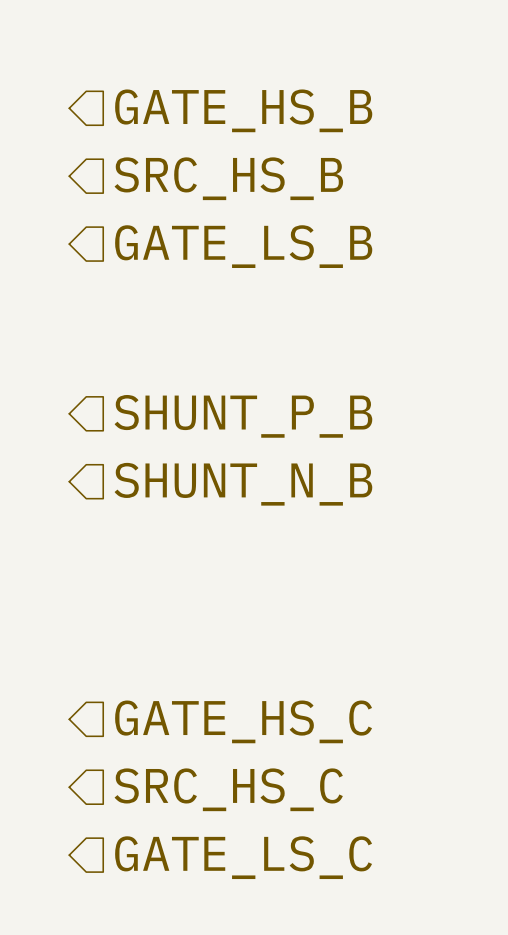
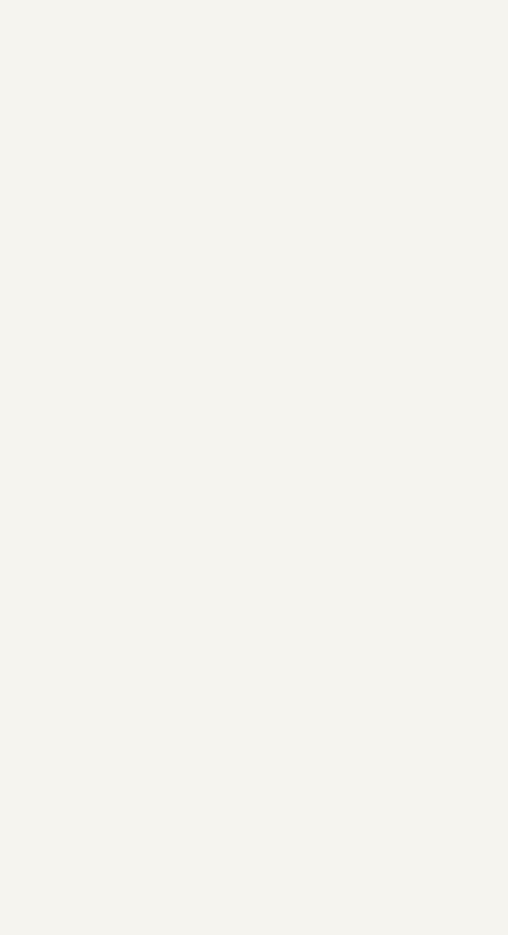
hierarchical label: GATE_HS_B (243, 110) -> none
hierarchical label: SRC_HS_B (228, 178) -> none
hierarchical label: GATE_LS_B (243, 246) -> none
hierarchical label: SHUNT_P_B (243, 416) -> none
hierarchical label: SHUNT_N_B (243, 484) -> none
hierarchical label: GATE_HS_C (243, 721) -> none
hierarchical label: SRC_HS_C (228, 789) -> none
hierarchical label: GATE_LS_C (243, 857) -> none

